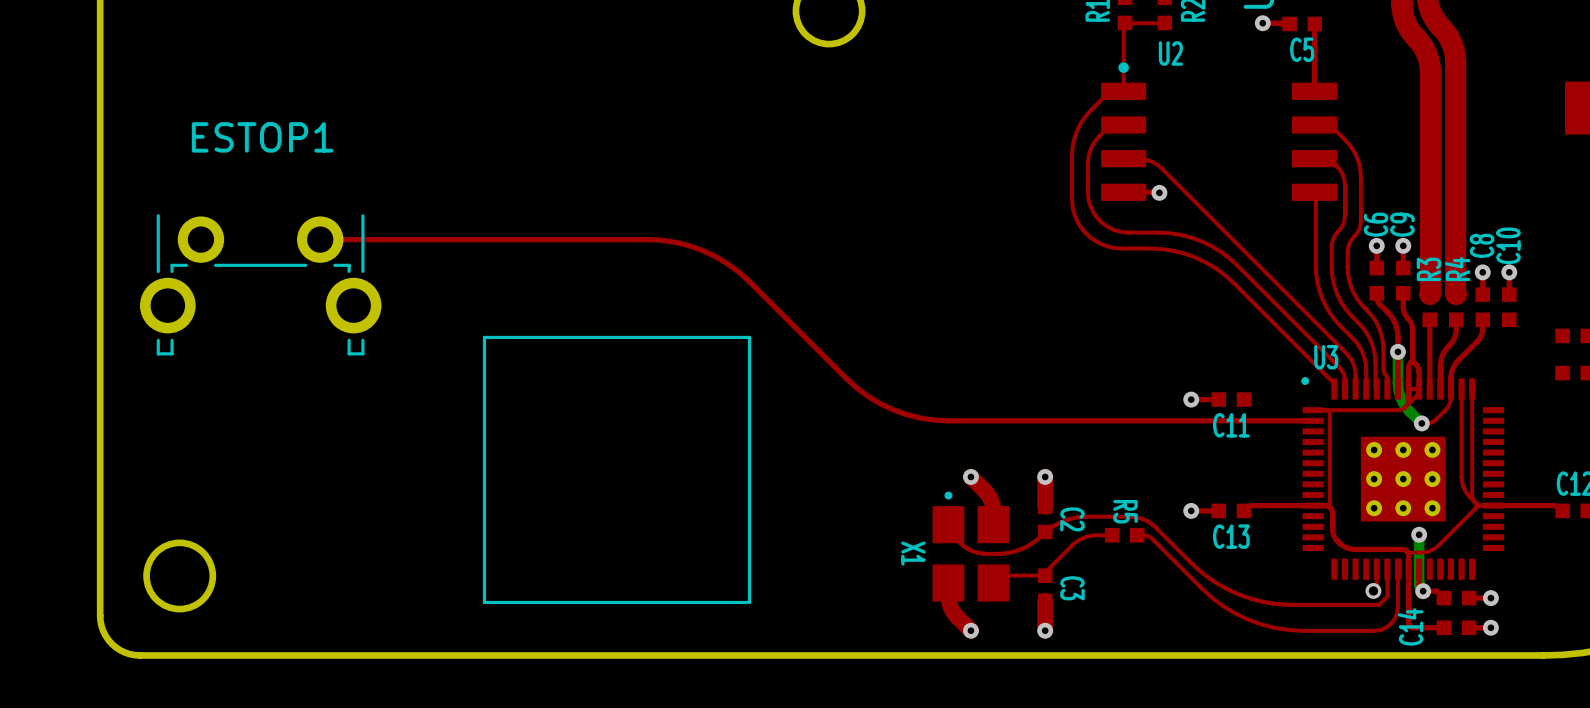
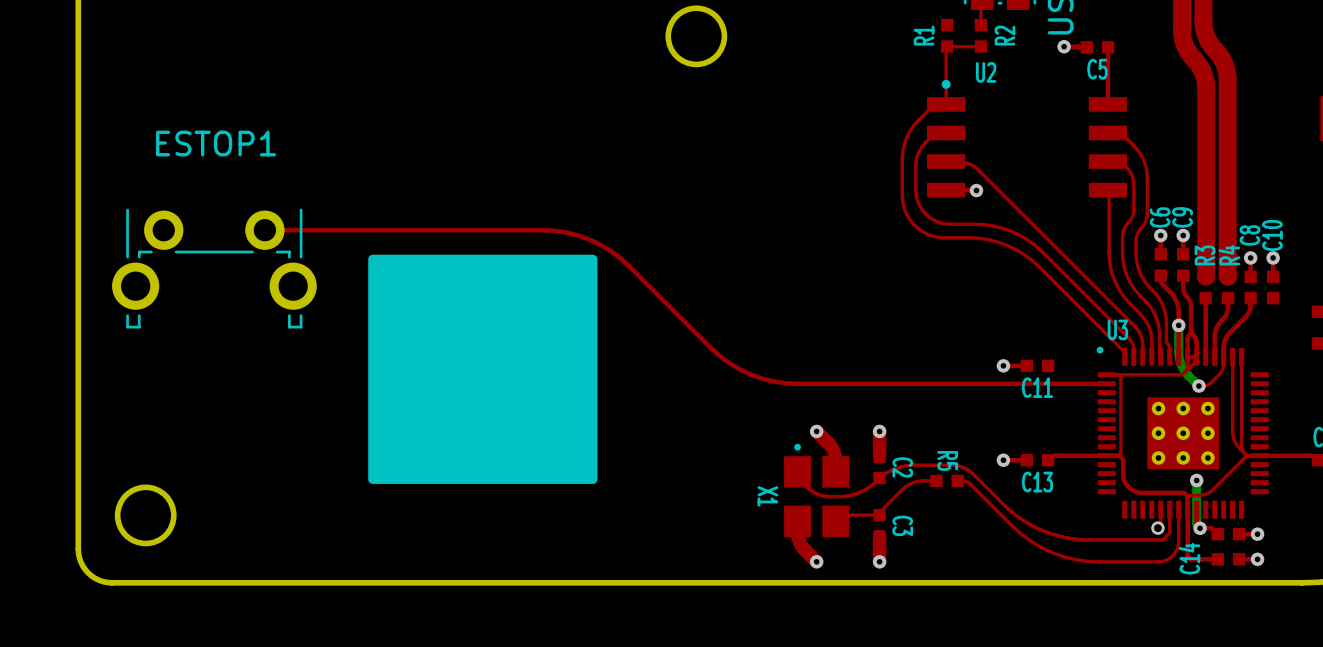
drawing: none -> [368, 254, 598, 484]
line: (484, 337) (749, 337) (749, 602) (484, 602) (484, 337) -> none

